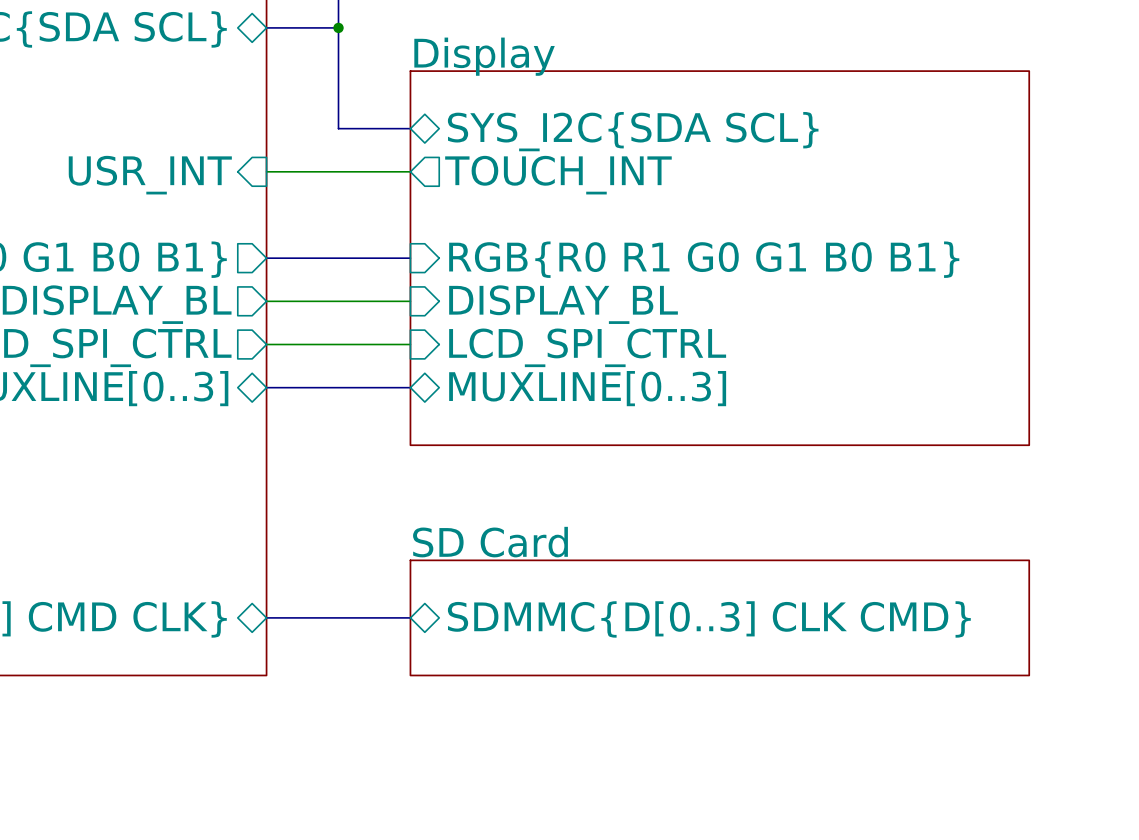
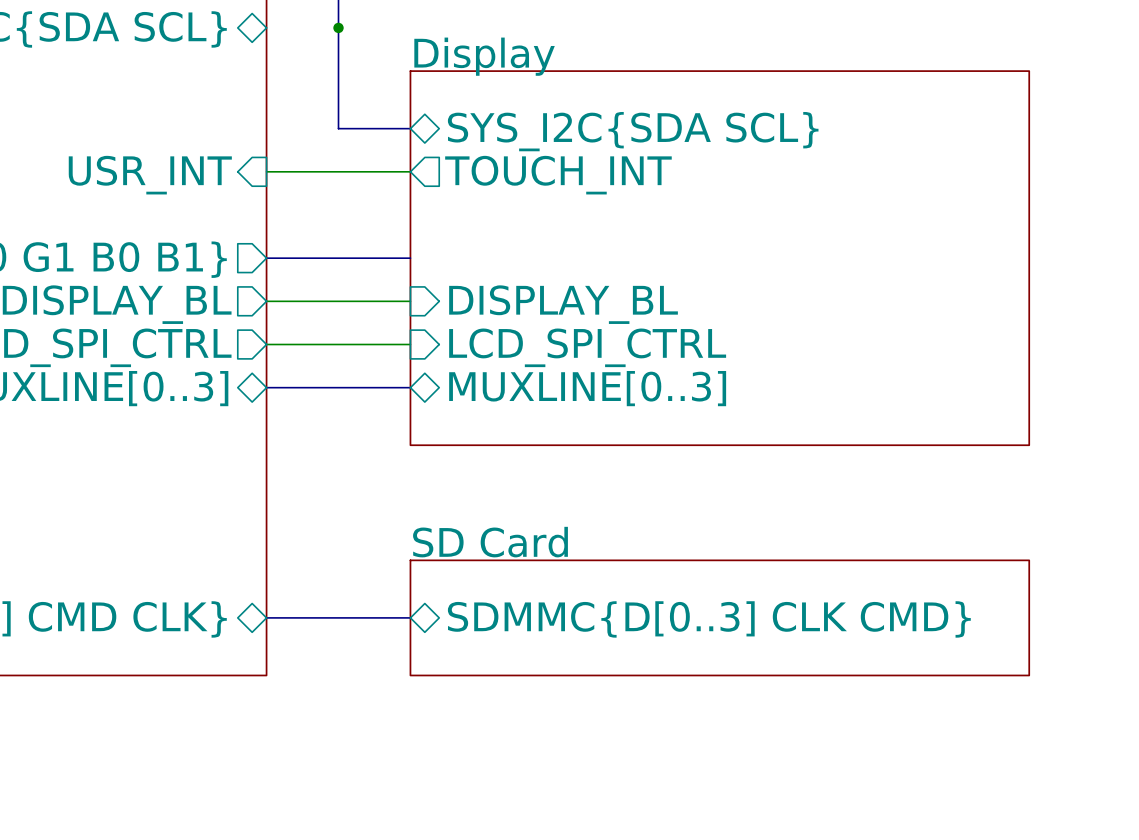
bus: (266, 27) (338, 27) -> none
sheet pin: RGB{R0 R1 G0 G1 B0 B1} (704, 259) -> none

